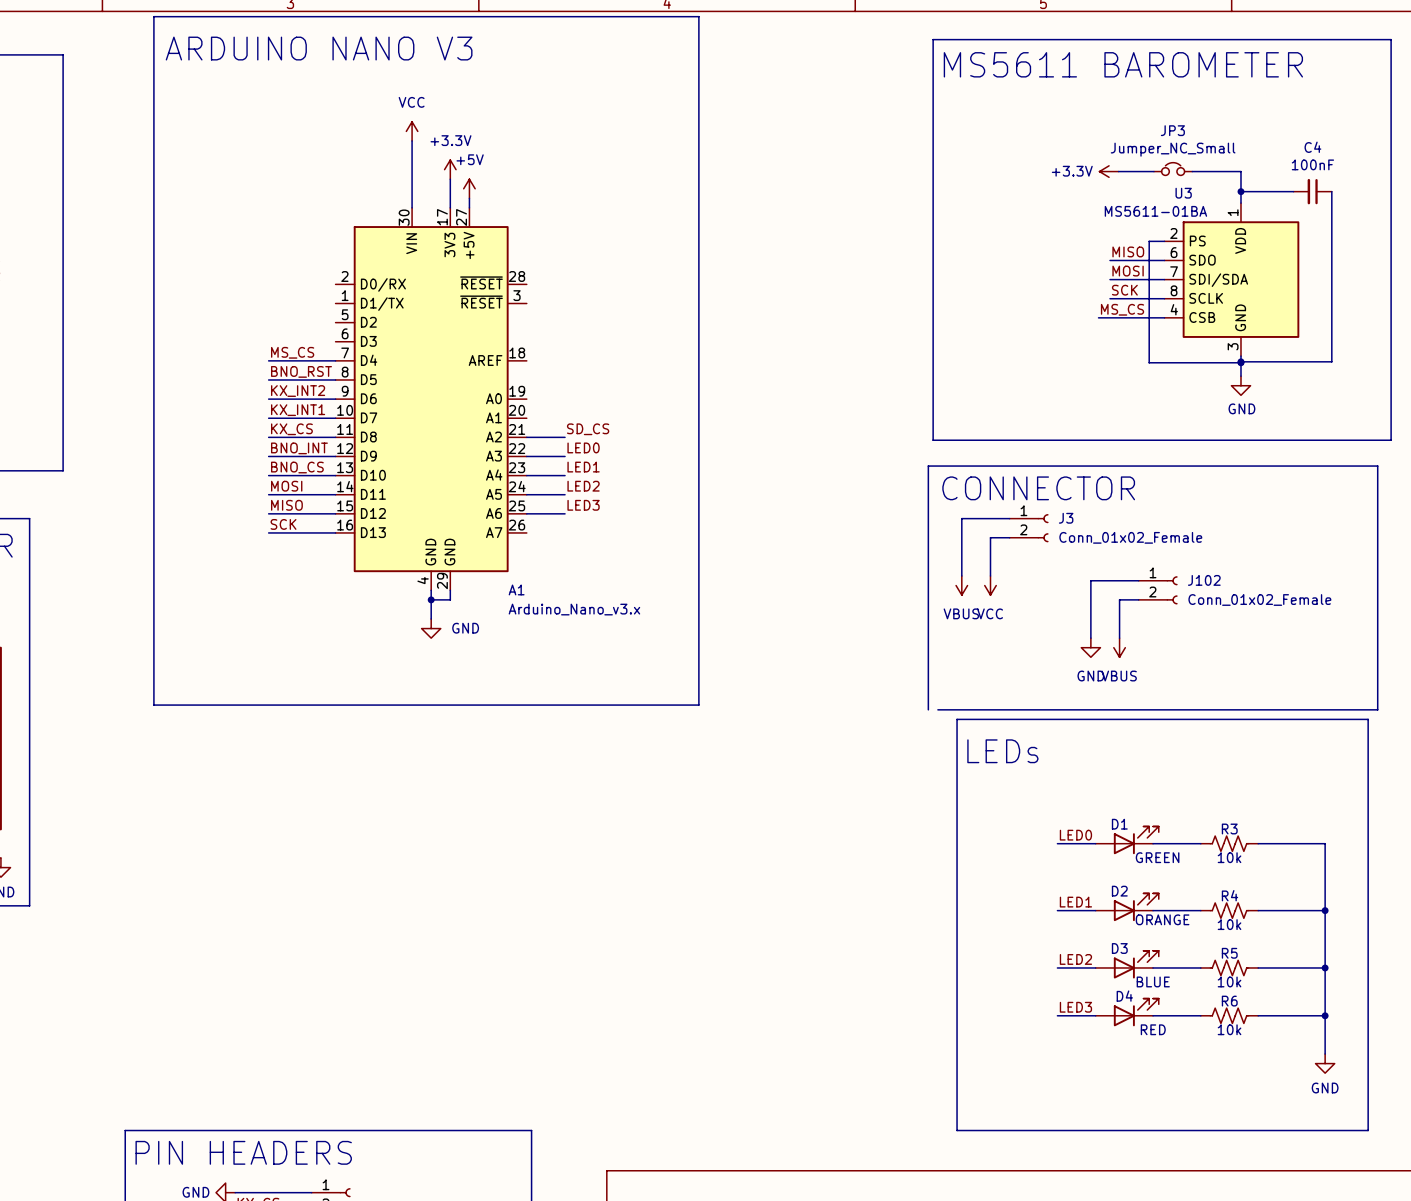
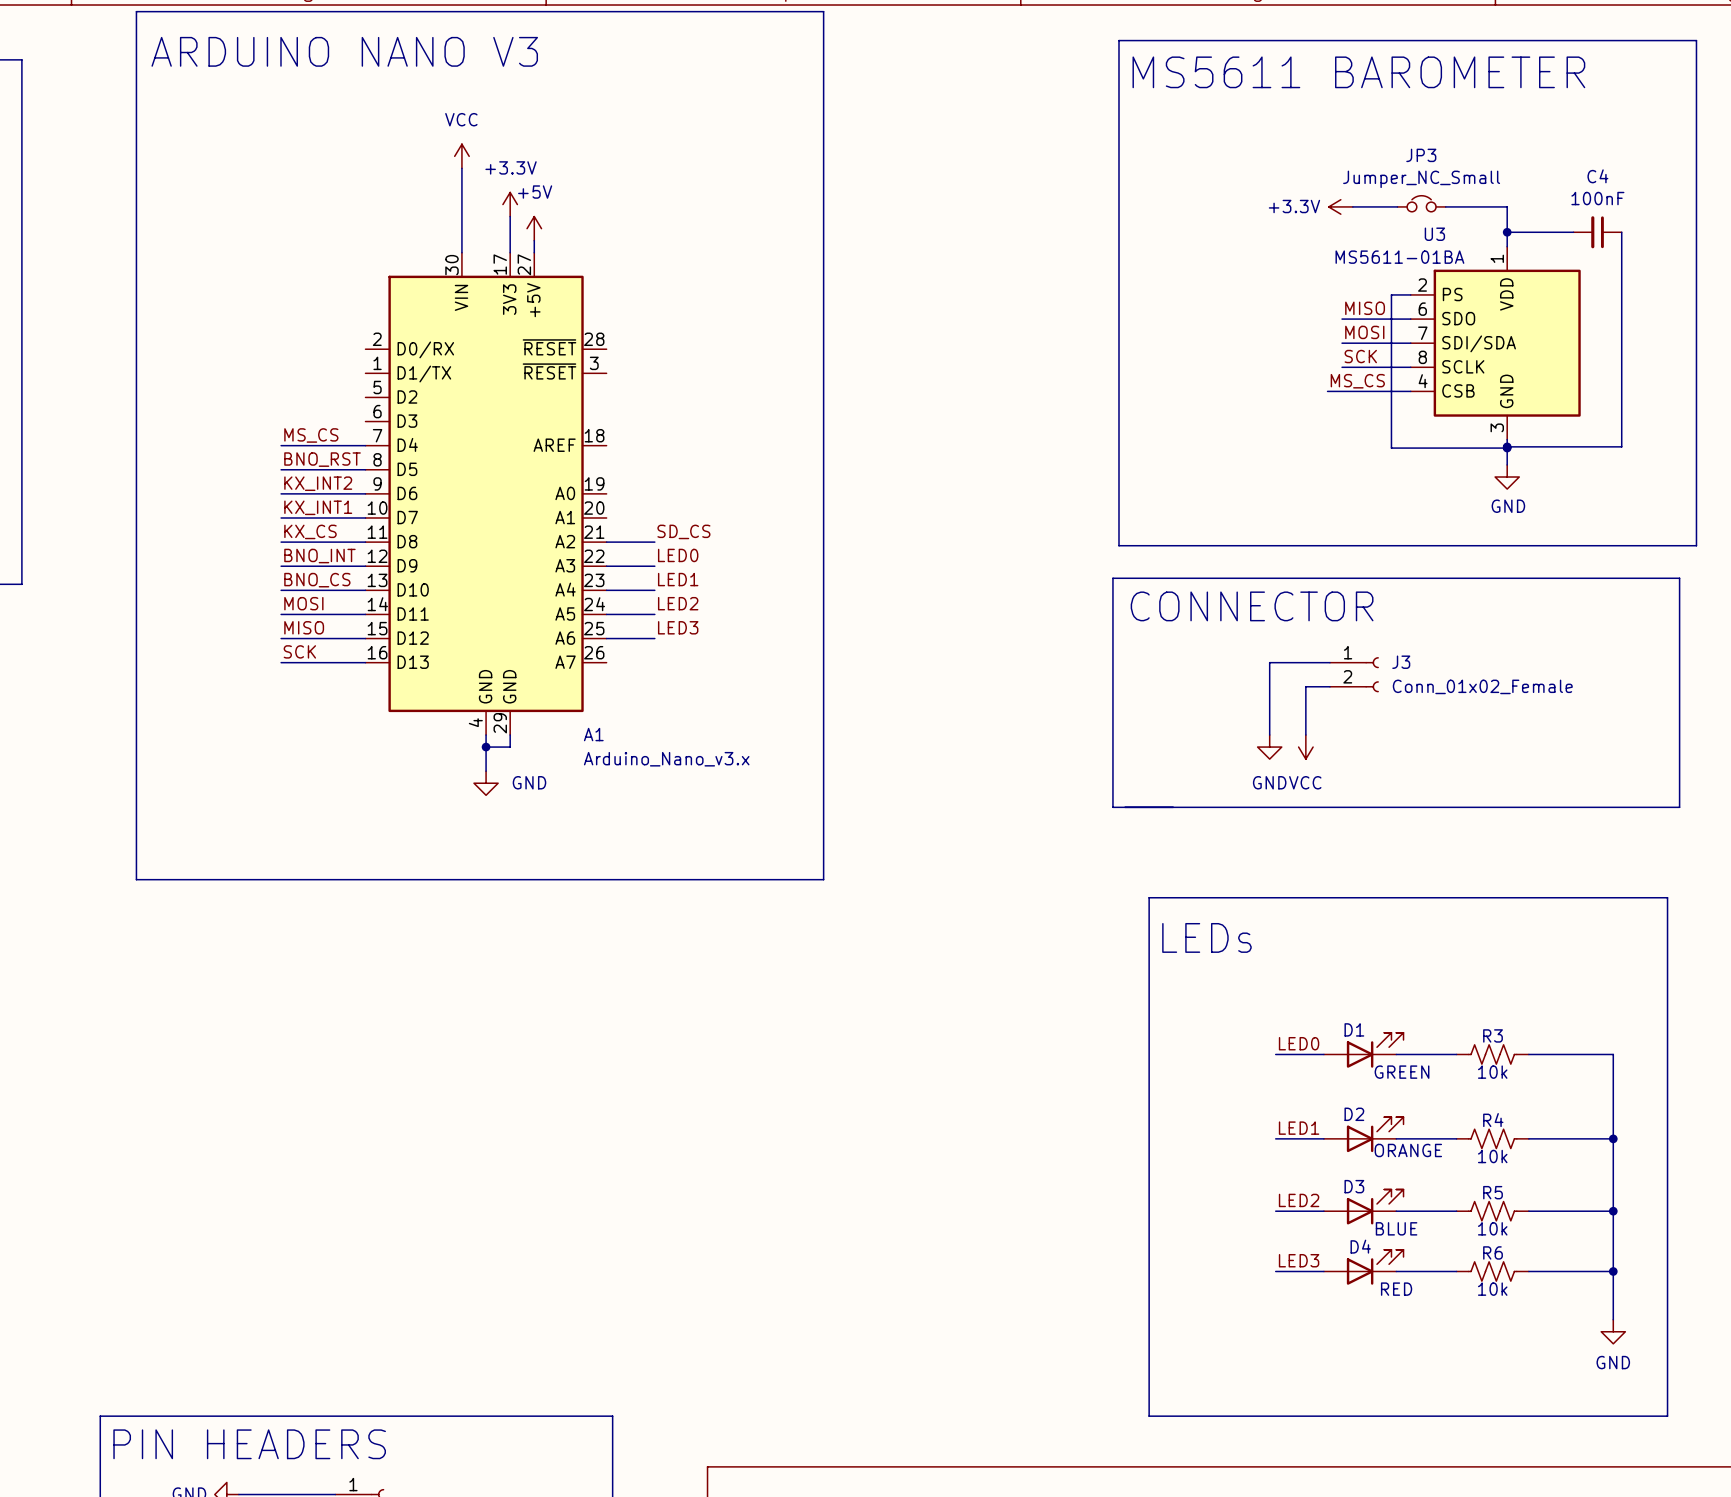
wire: (1009, 518) (961, 518) (961, 575) -> none
J3 position: (1029, 528) -> (1354, 674)
wire: (1009, 537) (990, 537) (990, 575) -> none
wire: (1138, 580) (1090, 580) (1090, 638) -> (1329, 662) (1269, 662) (1269, 735)
power symbol: VBUS (961, 585) -> none
power symbol position: VCC (990, 585) -> VCC (1305, 747)
J102: Conn_01x02_Female (1158, 590) -> none
wire: (1138, 599) (1119, 599) (1119, 638) -> (1329, 686) (1305, 686) (1305, 735)
line: (928, 647) (928, 709) -> none
power symbol position: GND (1090, 647) -> GND (1269, 747)
power symbol: VBUS (1119, 647) -> none
line: (1377, 647) (1377, 709) (937, 709) -> (1679, 807) (1112, 807)

